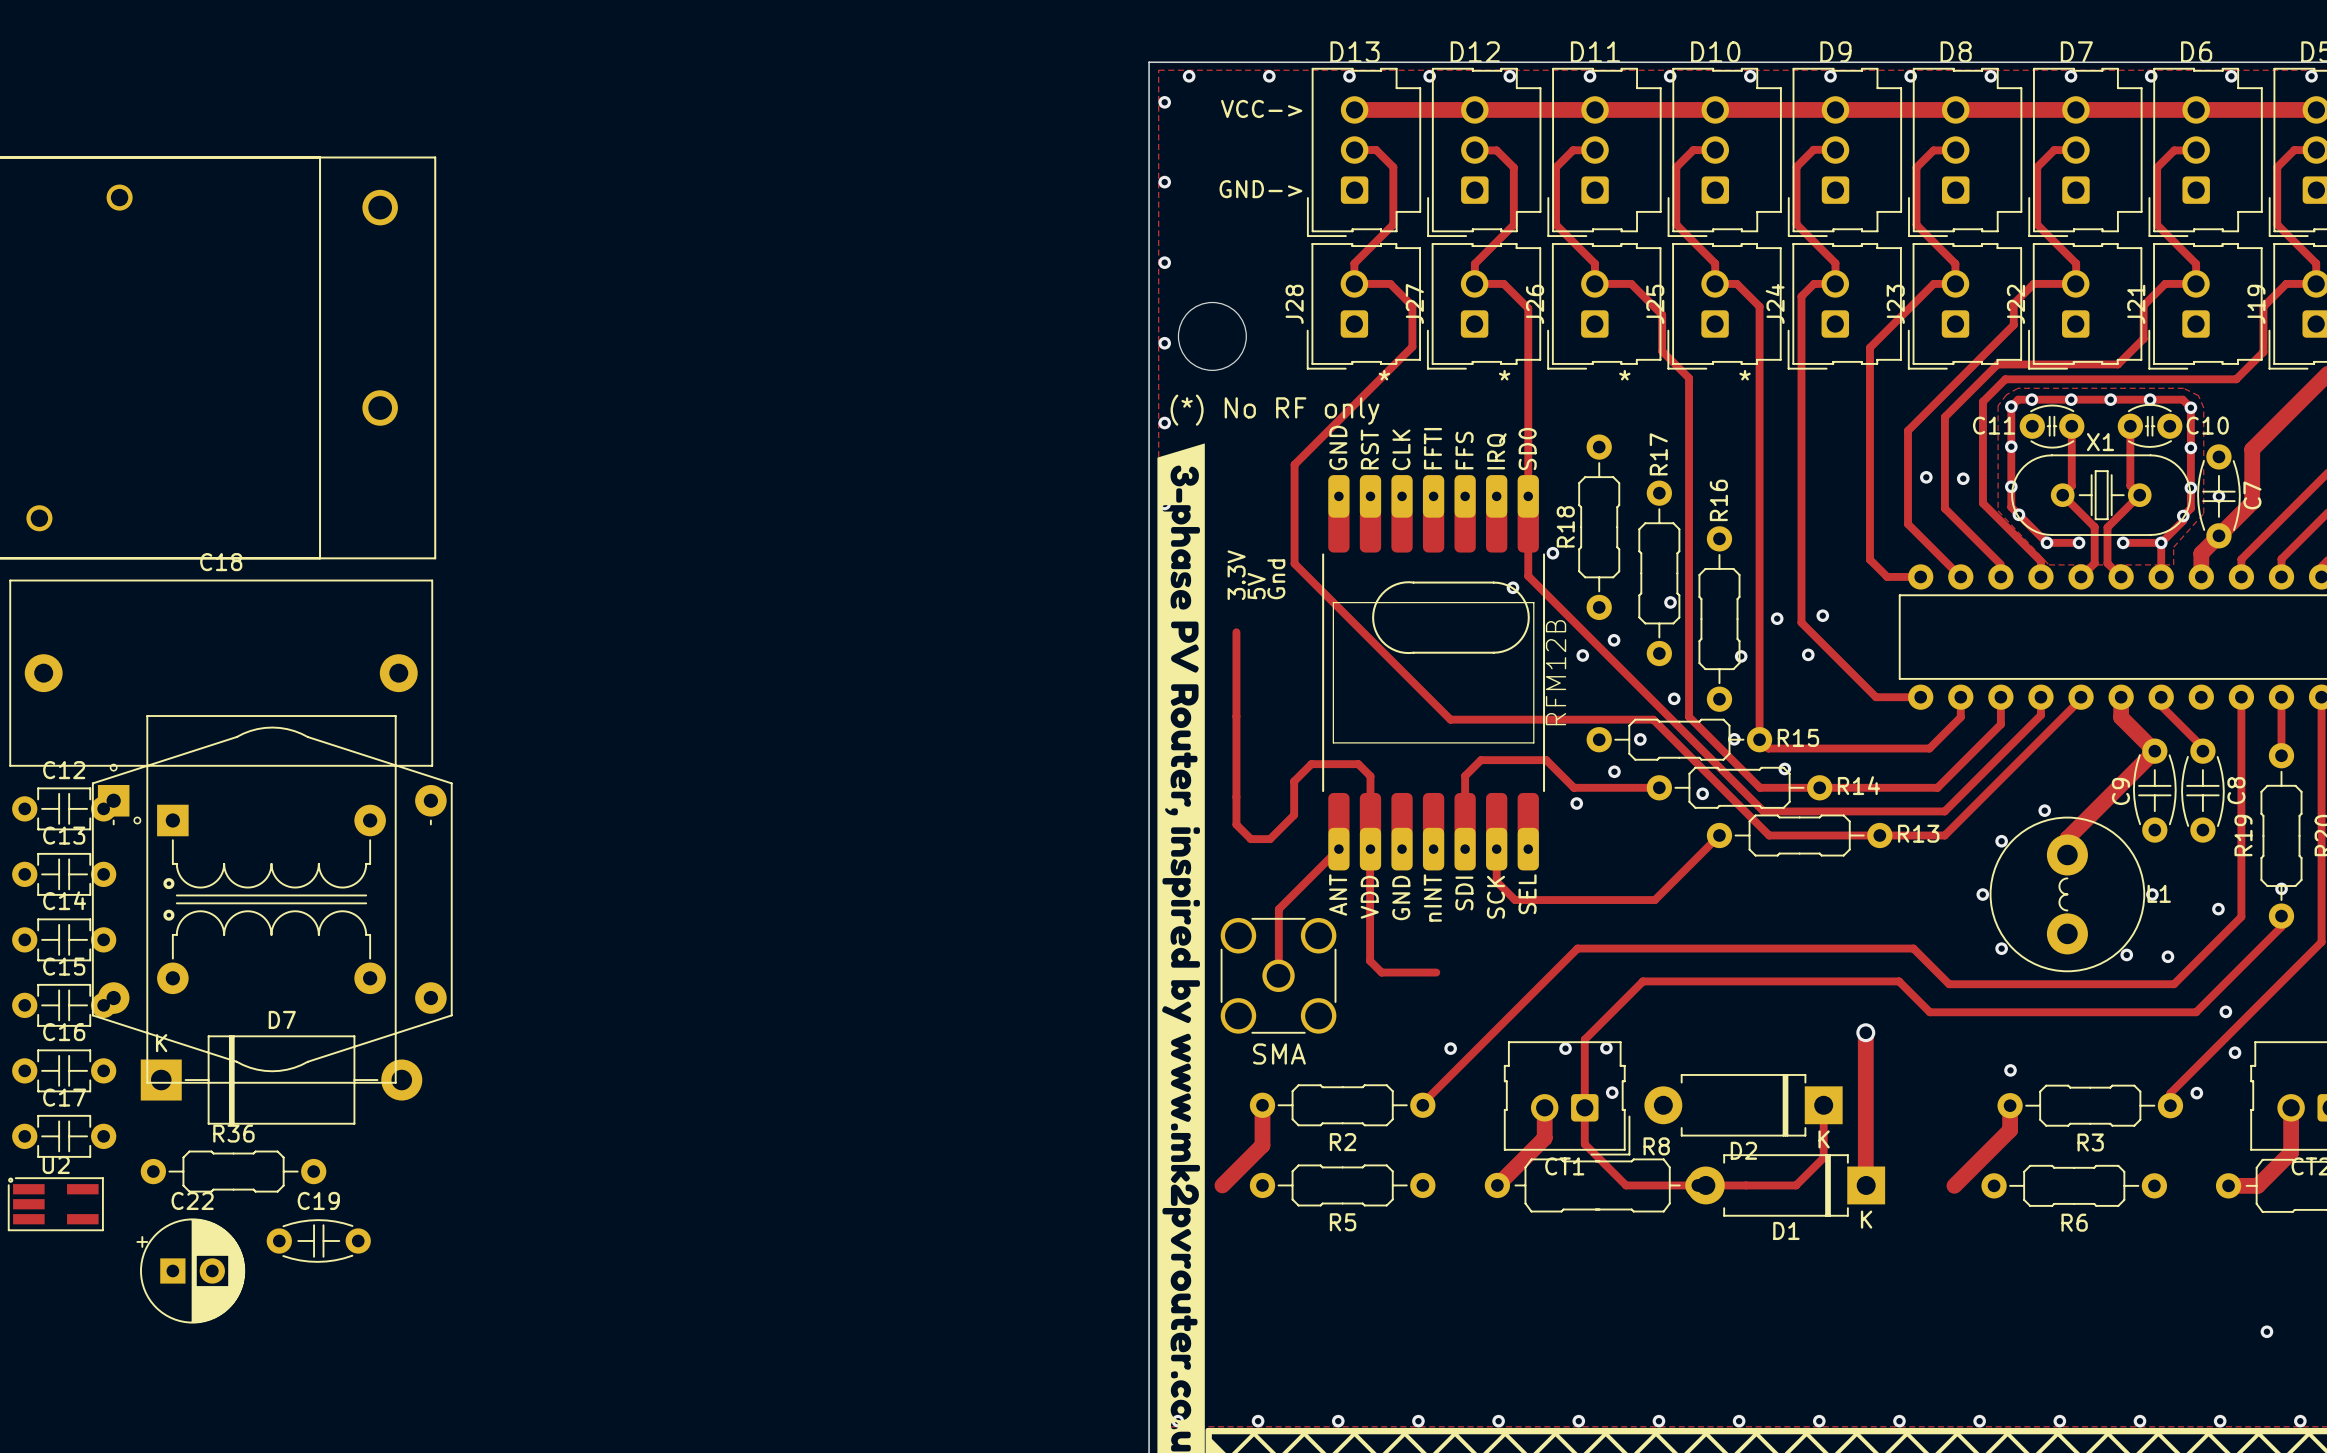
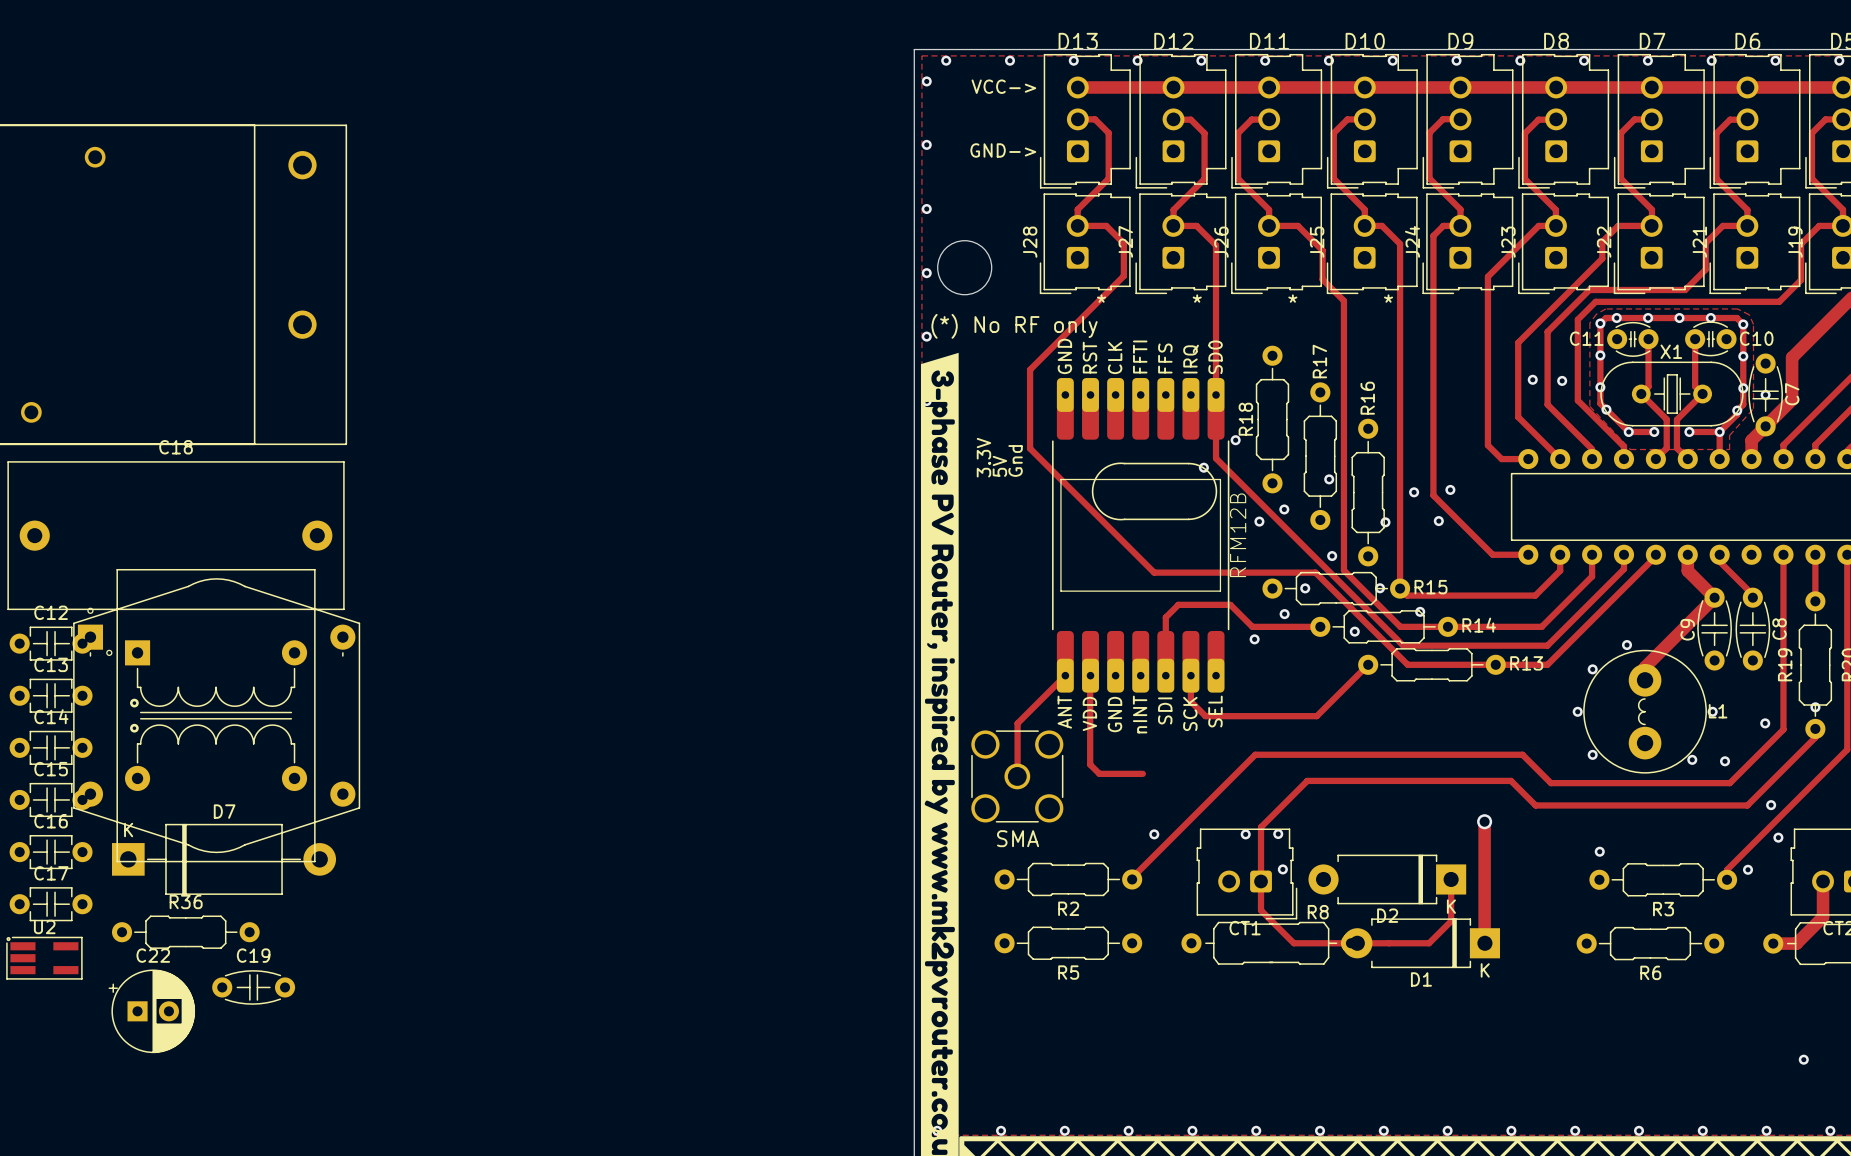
track: (1236, 632) (1236, 824) (1250, 839) (1270, 839) (1294, 815) (1294, 781) (1311, 764) (1358, 764) (1370, 776) (1370, 814) -> none
track: (1262, 1105) (1262, 1145) (1222, 1185) -> none
track: (2010, 1105) (2010, 1130) (1954, 1185) -> none
track: (1544, 1107) (1544, 1138) (1497, 1185) -> none

